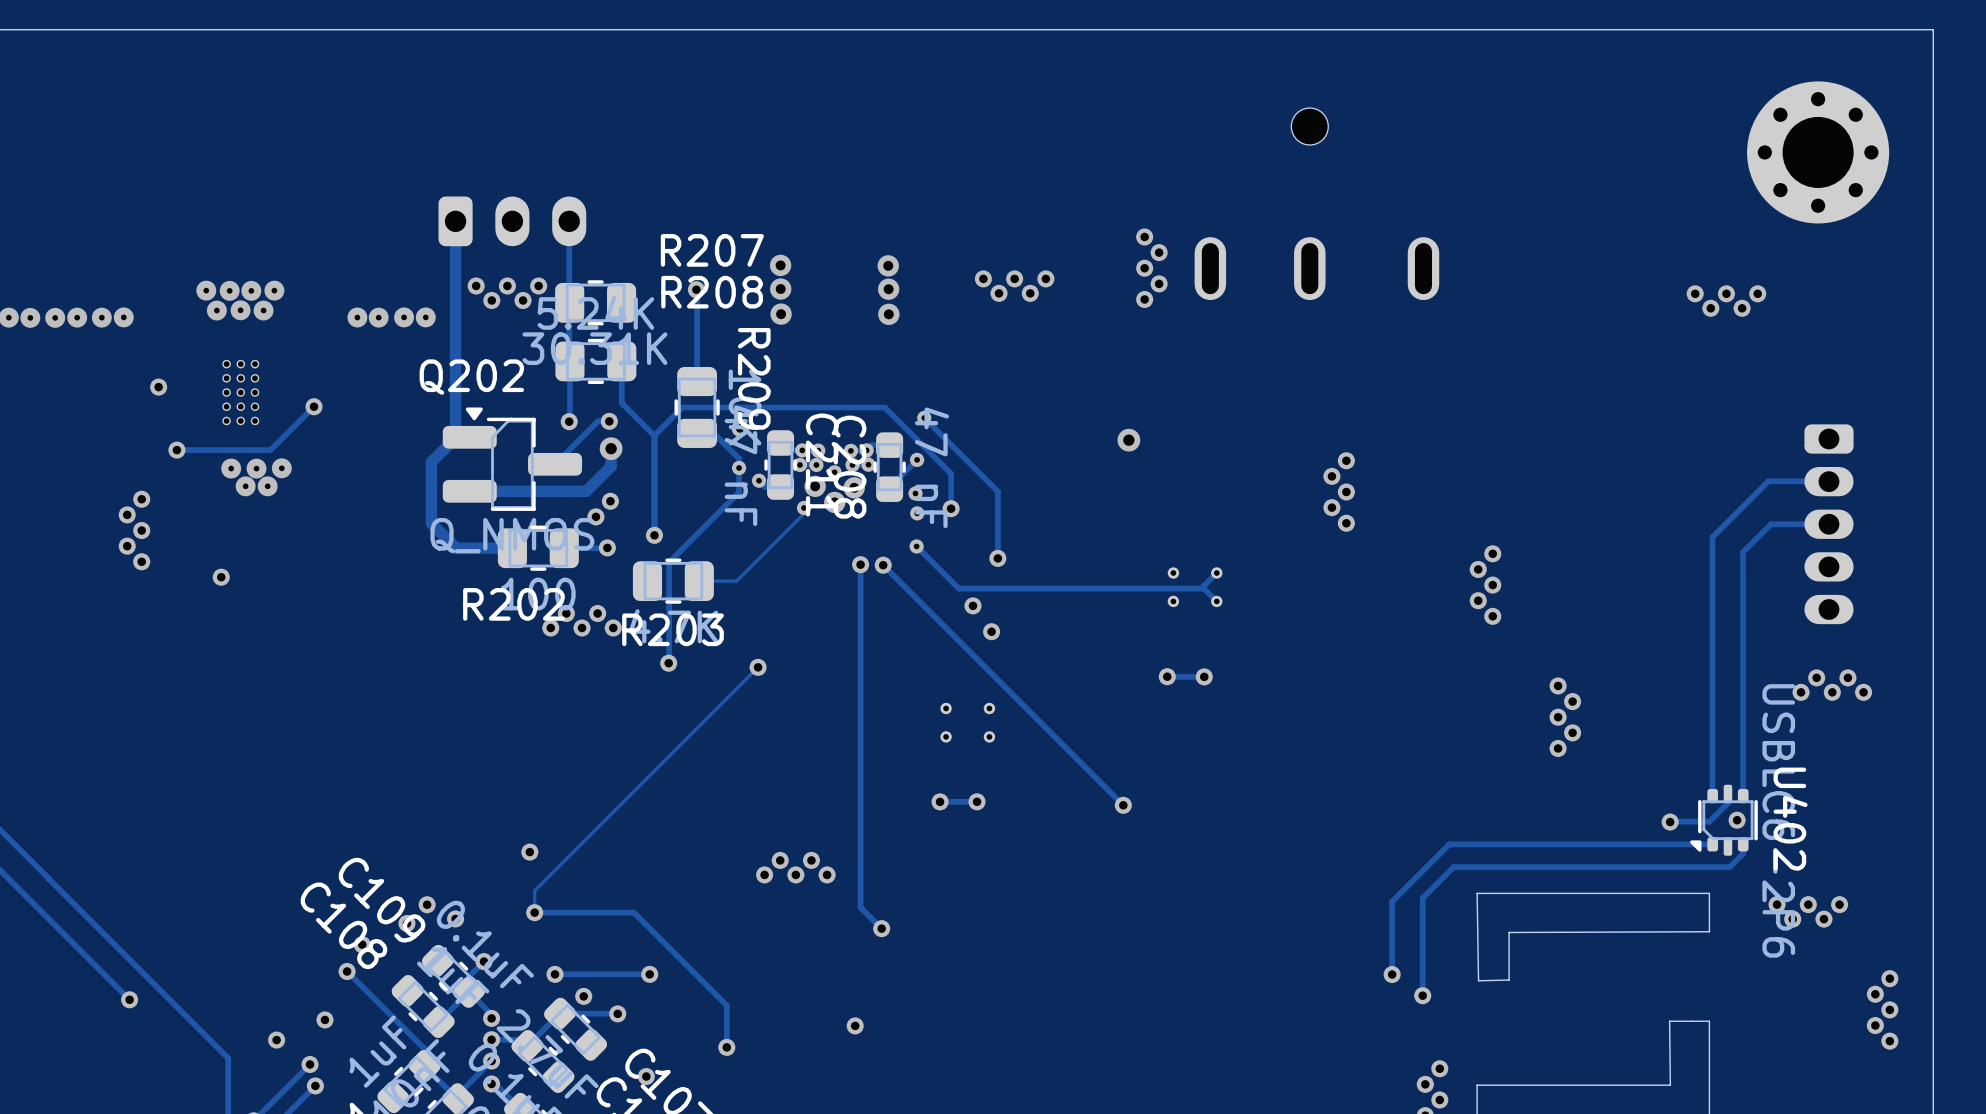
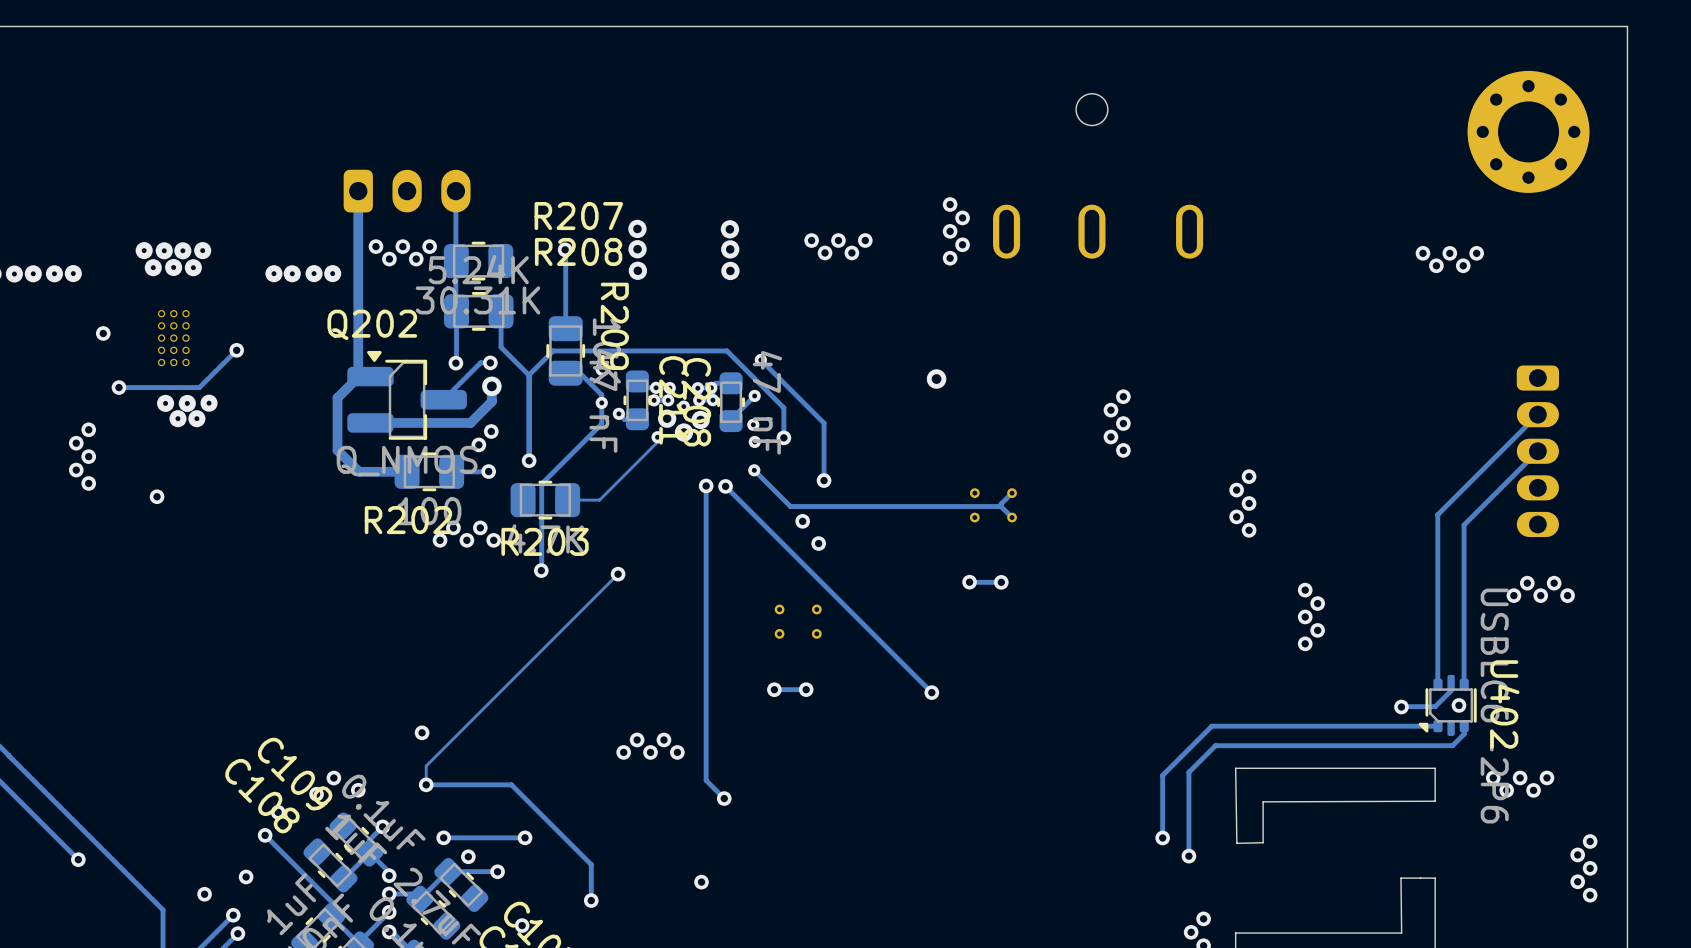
track: (1828, 481) (1768, 481) (1712, 537) (1712, 598) -> (1537, 414) (1437, 514)
track: (1828, 524) (1770, 524) (1743, 552) (1743, 610) -> (1537, 451) (1464, 525)

